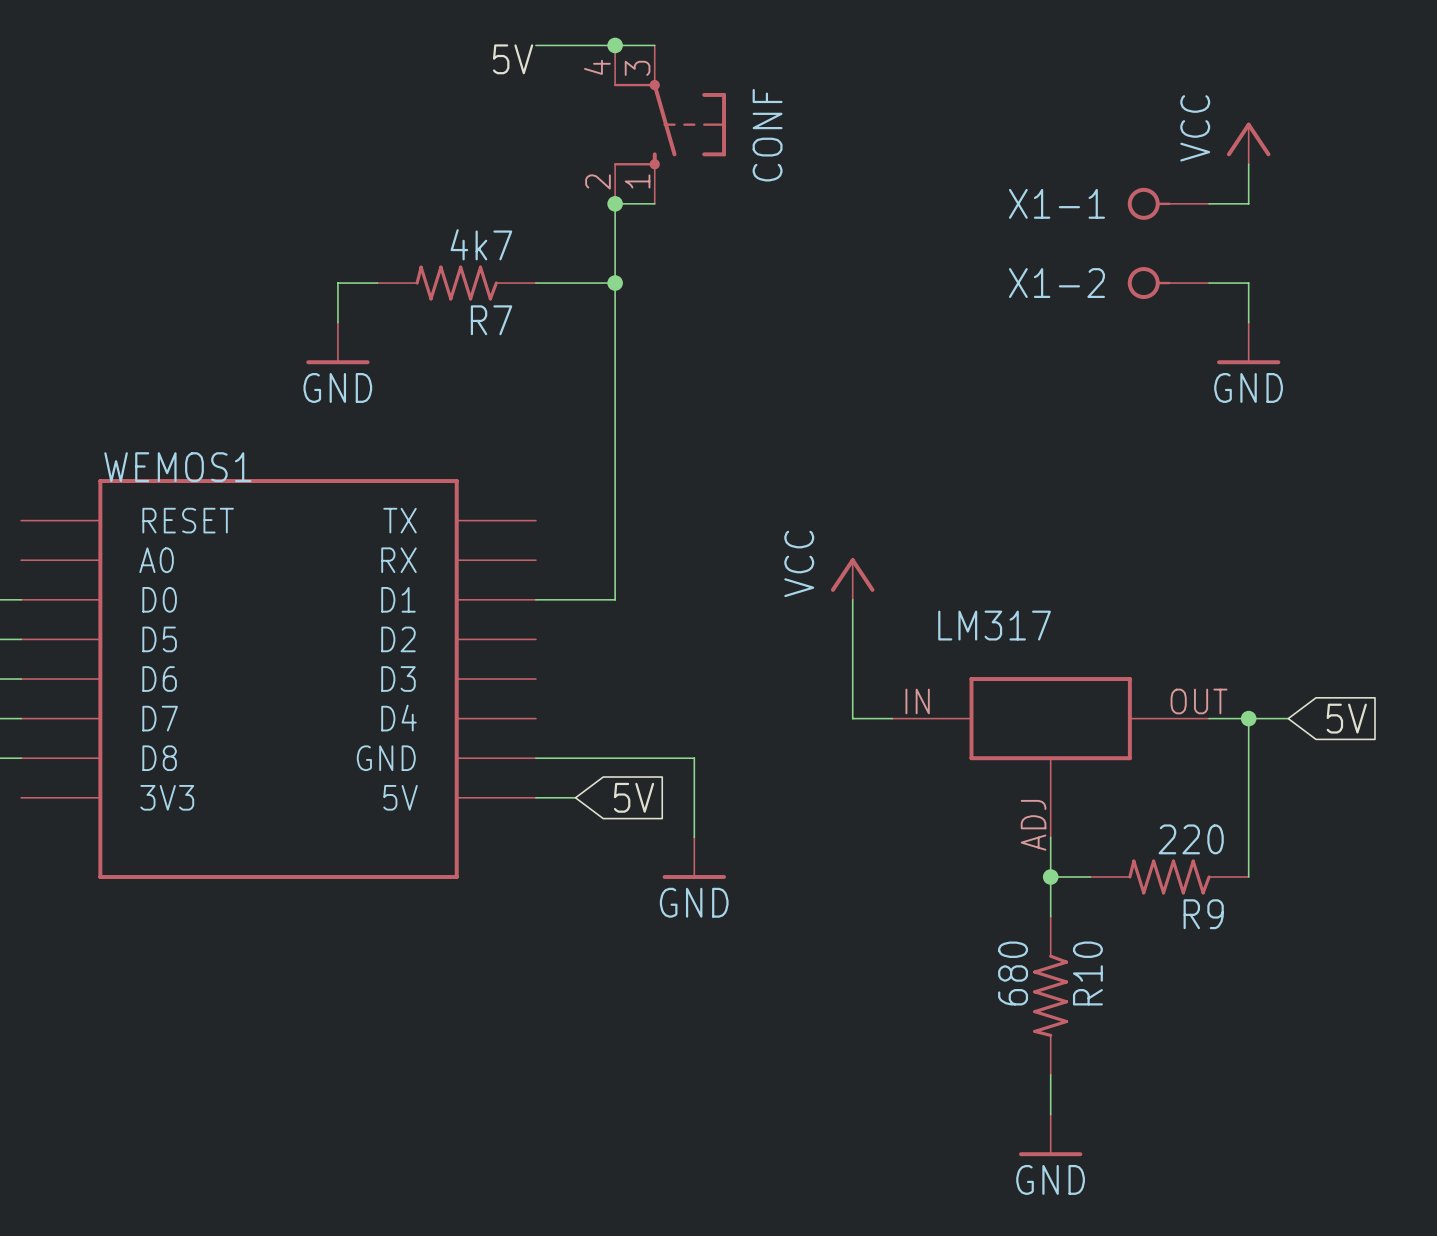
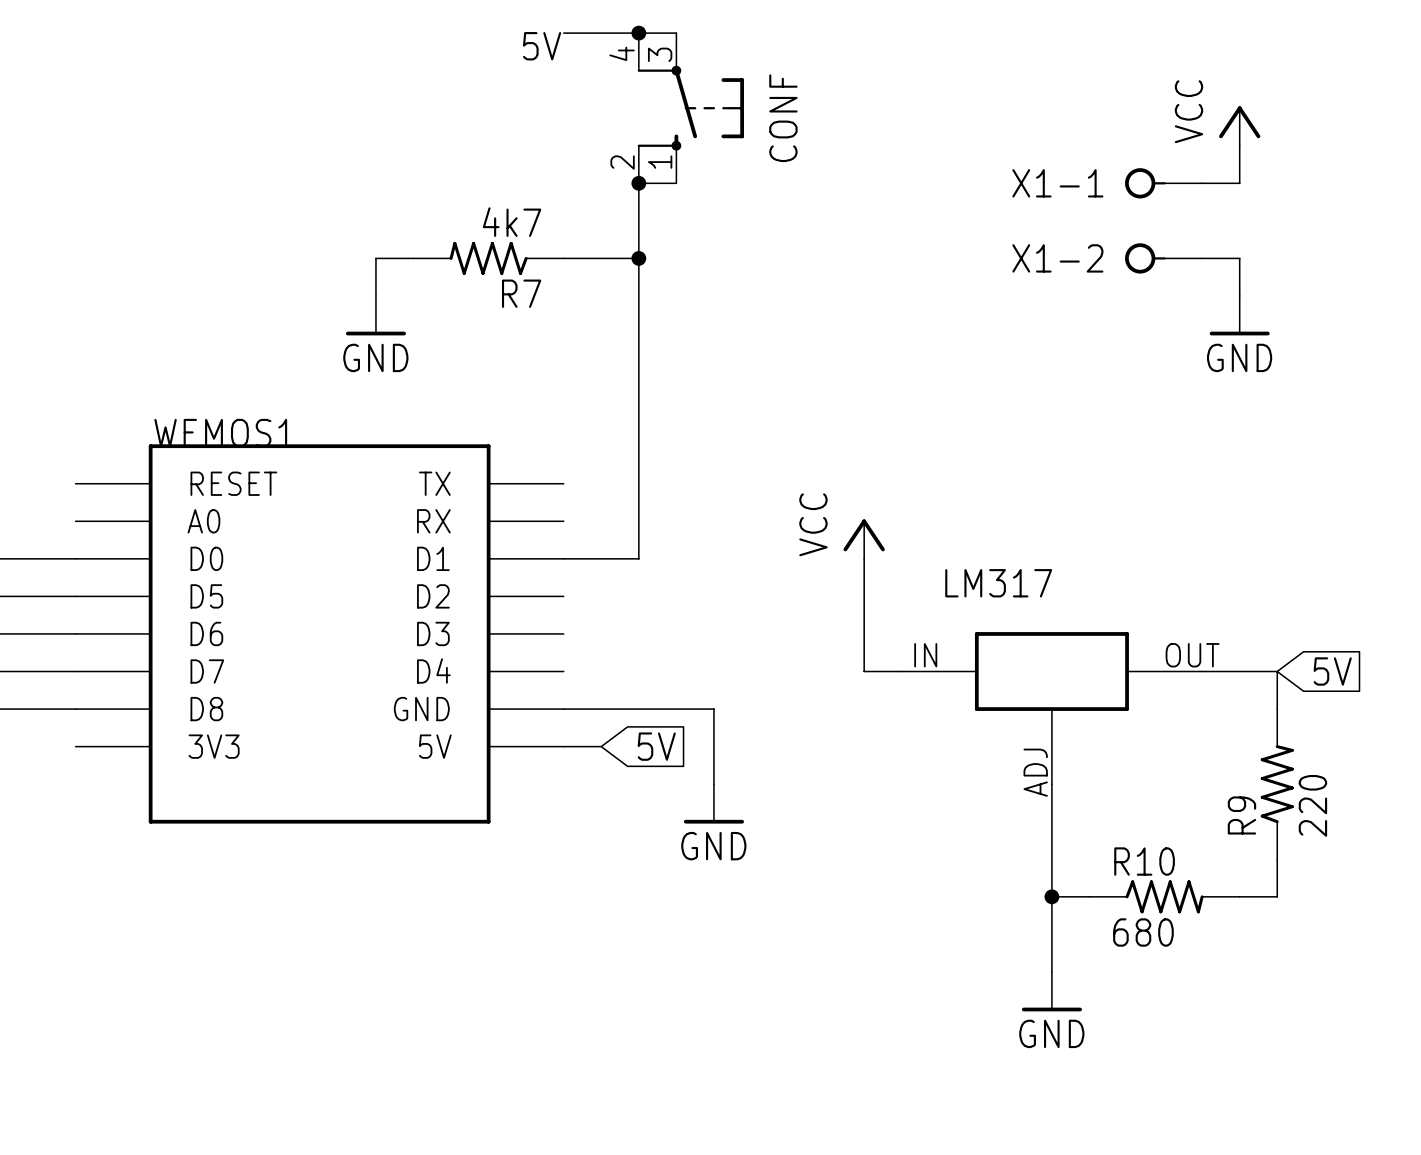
wire: (1248, 718) (1248, 877) -> none
junction: (1248, 718) -> none
wire: none -> (1277, 671) (1277, 709)
wire: (1050, 877) (1090, 877) -> (1051, 896) (1089, 896)
junction position: (1050, 877) -> (1051, 896)
R9 rotation: 0° (1169, 877) -> 90° clockwise (1277, 784)
R9 position: (1169, 877) -> (1277, 784)
wire: none -> (1277, 859) (1277, 896) (1239, 896)
R10 rotation: 0° (1050, 995) -> 90° counterclockwise (1164, 896)
R10 position: (1050, 995) -> (1164, 896)
wire: (1050, 1074) (1050, 1114) -> none
power symbol position: GND (1050, 1135) -> GND (1051, 991)

